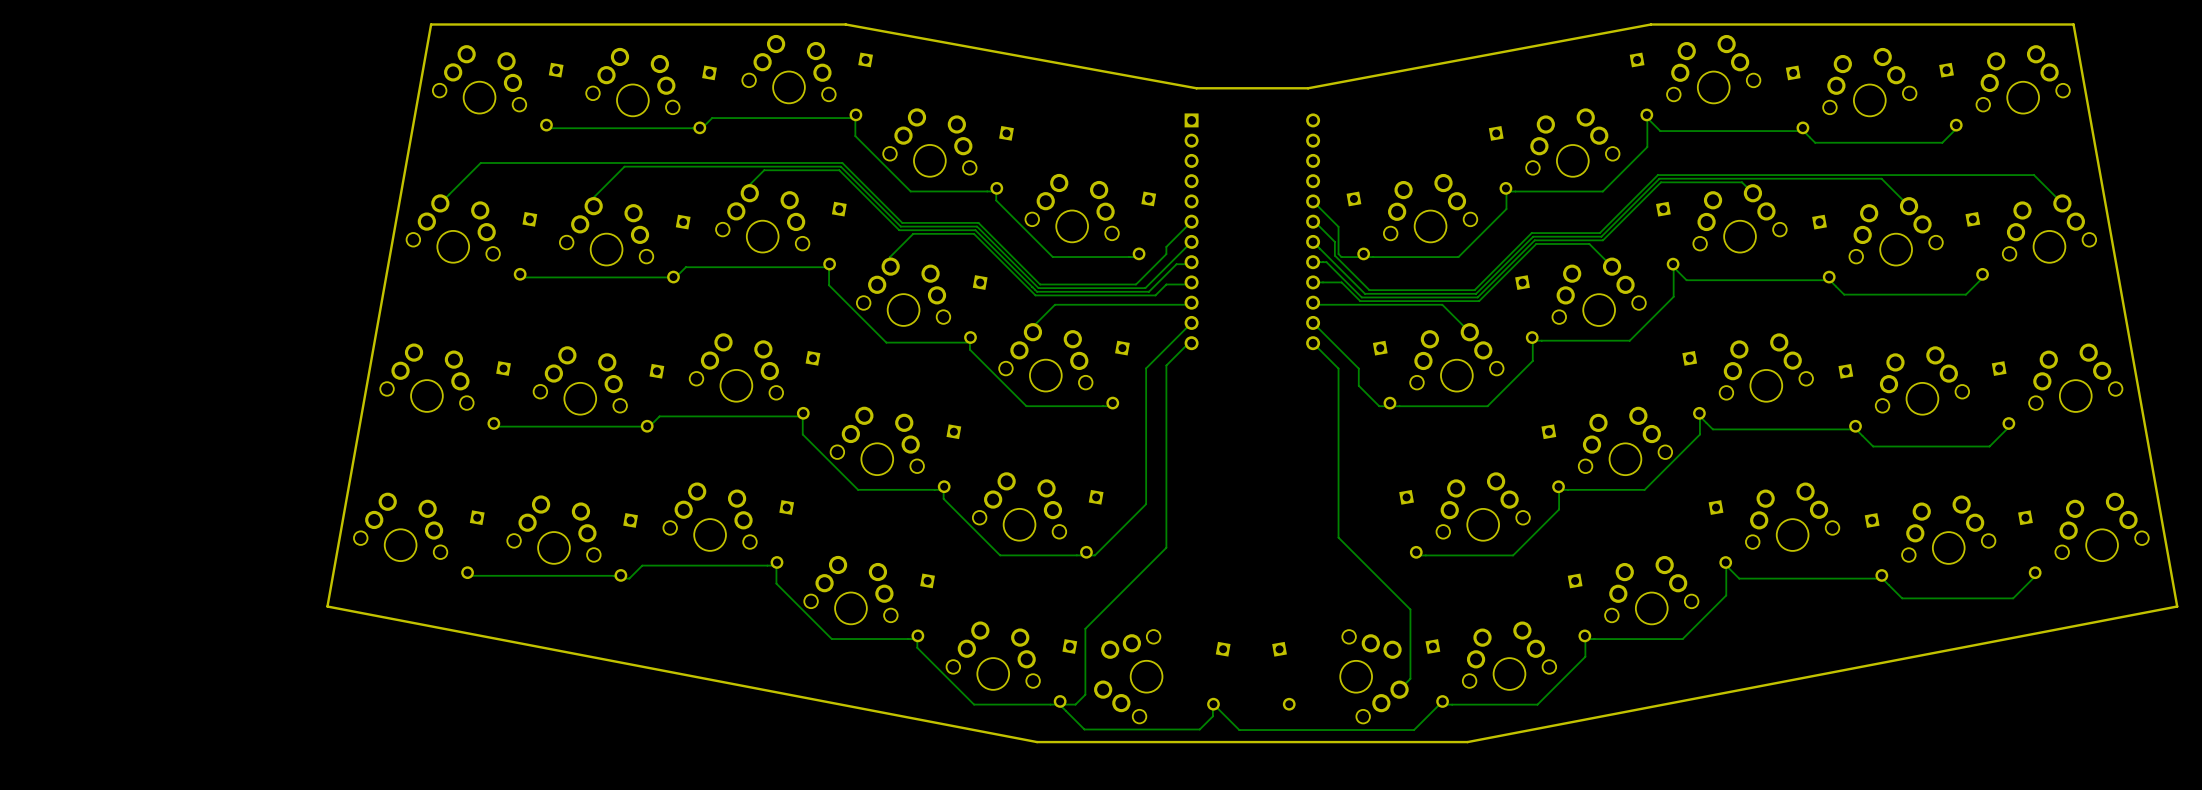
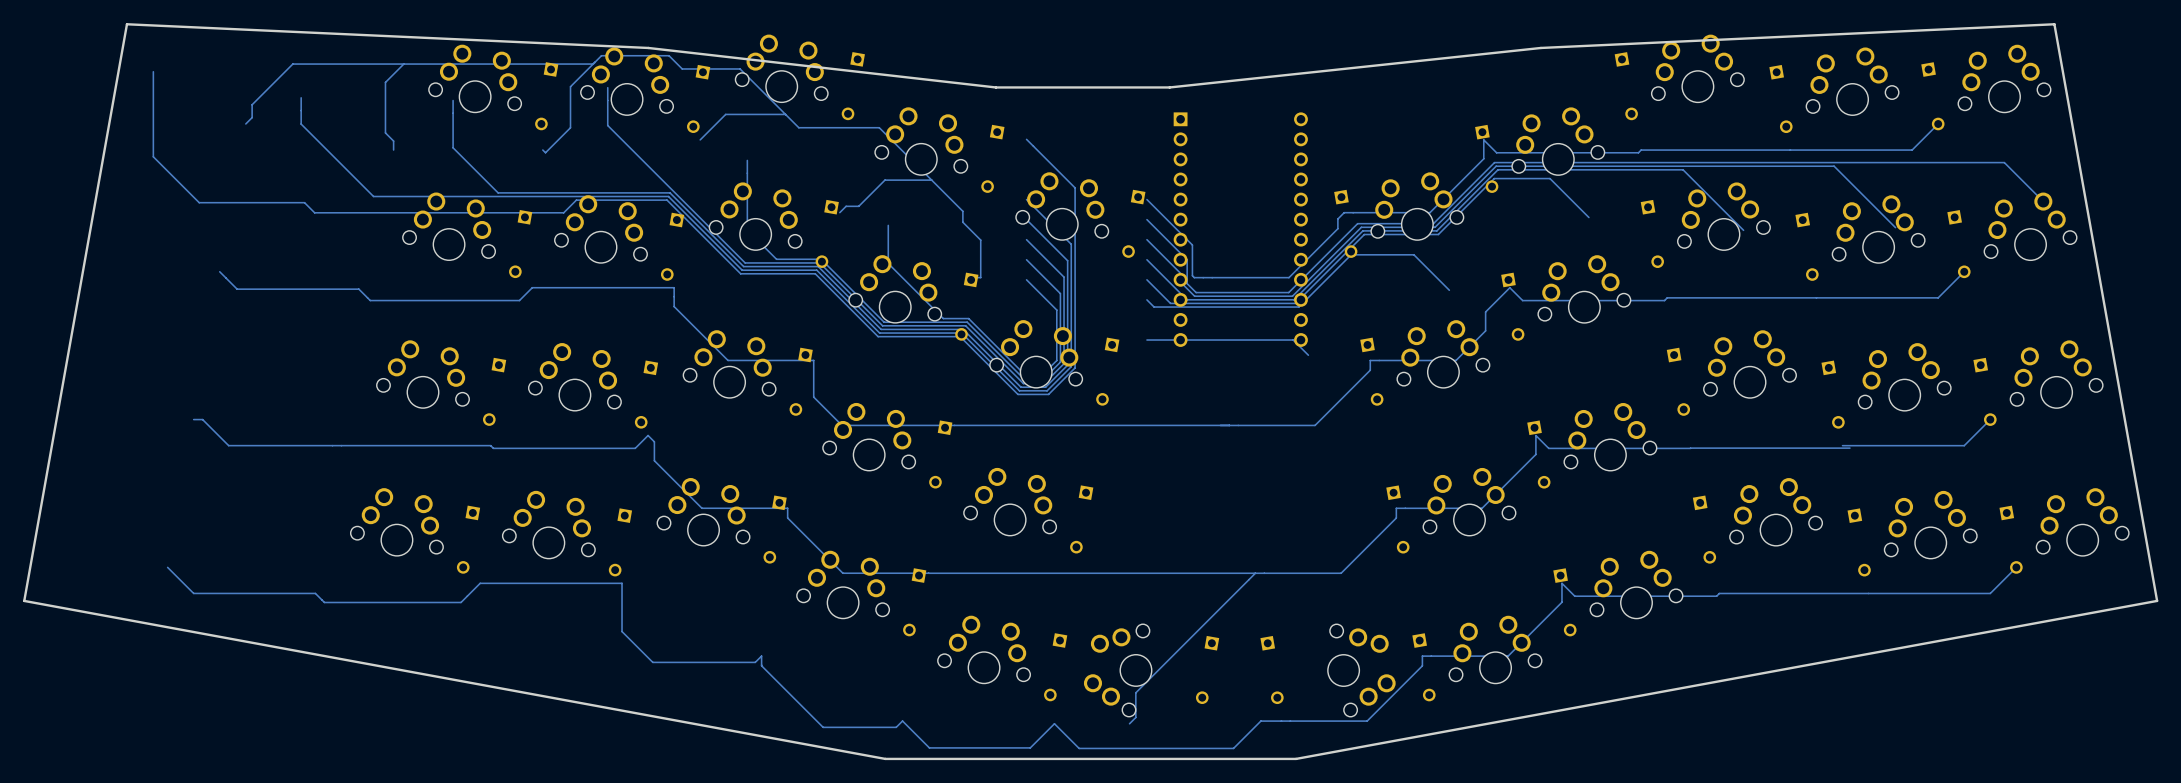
board edge: (2073, 24) (1650, 24) (1308, 88) (1196, 88) (845, 24) (431, 24) (327, 606) (1037, 742) (1467, 742) (2177, 606) -> (2054, 24) (1540, 47) (1169, 87) (995, 87) (648, 47) (126, 24) (24, 600) (885, 758) (1296, 758) (2157, 600)
track: none -> (403, 64) (385, 82) (385, 132) (393, 141) (393, 150)
track: none -> (593, 64) (292, 64) (252, 104) (252, 117) (245, 123)
track: none -> (153, 71) (153, 156) (199, 202) (304, 202) (314, 212) (563, 212) (576, 200) (667, 200) (740, 273) (815, 273) (878, 336) (960, 336) (1017, 394) (1048, 394) (1075, 367) (1075, 187) (1026, 139)
track: none -> (607, 87) (607, 125) (745, 262) (819, 262) (882, 325) (965, 325) (1023, 383) (1044, 383) (1064, 363) (1064, 277) (1026, 239)
track: none -> (301, 97) (301, 124) (373, 196) (668, 196) (742, 270) (816, 270) (879, 333) (961, 333) (1019, 390) (1047, 390) (1071, 366) (1071, 244) (1026, 199)
track: none -> (453, 100) (453, 147) (498, 192) (670, 192) (743, 266) (818, 266) (881, 329) (963, 329) (1020, 387) (1045, 387) (1067, 365) (1067, 260) (1026, 219)
track: none -> (785, 114) (725, 114) (700, 139)
track: none -> (1938, 123) (1912, 150) (1641, 150) (1638, 152) (1496, 152) (1483, 139) (1483, 158) (1429, 212) (1344, 212) (1337, 219) (1337, 228) (1288, 277) (1194, 277) (1192, 275) (1192, 245) (1146, 199)
track: (545, 128) (692, 128) (699, 130) (712, 118) (855, 118) (855, 136) (910, 191) (996, 191) (996, 200) (1052, 257) (1138, 257) -> none
track: (1956, 128) (1942, 142) (1815, 142) (1803, 131) (1660, 131) (1647, 118) (1647, 147) (1602, 191) (1506, 191) (1506, 209) (1458, 257) (1341, 257) (1338, 254) (1338, 226) (1313, 201) -> none
track: none -> (542, 150) (545, 152) (570, 127) (570, 86) (601, 55) (669, 55) (682, 68) (740, 68) (798, 127) (879, 127) (962, 211) (962, 222) (980, 240) (980, 277) (971, 277)
track: none -> (747, 160) (747, 230) (776, 259) (821, 259) (884, 322) (967, 322) (1024, 379) (1042, 379) (1060, 362) (1060, 293) (1026, 259)
track: (2033, 175) (1657, 175) (1599, 233) (1531, 233) (1474, 290) (1369, 290) (1334, 255) (1334, 241) (1314, 221) -> (2015, 173) (2004, 162) (1494, 162) (1433, 223) (1357, 223) (1288, 292) (1196, 292) (1187, 283) (1187, 259) (1146, 219)
track: none -> (931, 180) (884, 180) (858, 206) (846, 206) (839, 212)
track: (1752, 193) (1742, 182) (1660, 182) (1602, 240) (1534, 240) (1477, 297) (1361, 297) (1326, 262) (1313, 262) -> none
track: (749, 197) (749, 185) (764, 170) (839, 170) (899, 230) (975, 230) (1037, 291) (1148, 291) (1176, 264) (1189, 264) -> none
track: (593, 198) (624, 166) (840, 166) (900, 226) (977, 226) (1038, 288) (1145, 288) (1191, 241) -> none
track: (440, 203) (480, 162) (842, 162) (902, 222) (978, 222) (1040, 284) (1136, 284) (1166, 254) (1166, 246) (1191, 221) -> none
track: (1909, 206) (1881, 178) (1659, 178) (1601, 236) (1533, 236) (1476, 293) (1364, 293) (1313, 241) -> none
track: none -> (1588, 217) (1549, 178) (1494, 178) (1438, 234) (1364, 234) (1295, 303) (1170, 303) (1146, 279)
track: none -> (888, 225) (888, 263) (943, 318) (968, 318) (1025, 375) (1041, 375) (1056, 360) (1056, 310) (1026, 279)
track: none -> (1895, 227) (1834, 166) (1496, 166) (1435, 227) (1361, 227) (1292, 296) (1194, 296) (1183, 285) (1183, 276) (1146, 239)
track: none -> (1743, 230) (1683, 169) (1497, 169) (1436, 230) (1362, 230) (1294, 299) (1186, 299) (1146, 259)
track: (1612, 266) (1589, 243) (1536, 243) (1479, 301) (1360, 301) (1341, 282) (1313, 282) -> none
track: (890, 271) (890, 256) (913, 233) (974, 233) (1035, 295) (1155, 295) (1166, 284) (1189, 284) (1191, 282) -> none
track: none -> (219, 271) (237, 289) (358, 289) (370, 300) (519, 300) (532, 287) (674, 287) (674, 306) (728, 360) (813, 360) (813, 397) (842, 425) (1229, 425)
track: none -> (1964, 271) (1938, 297) (1667, 297) (1664, 300) (1522, 300) (1509, 287) (1485, 311) (1485, 330) (1455, 360) (1370, 360) (1370, 370) (1315, 425) (1220, 425)
track: (519, 277) (670, 277) (672, 280) (685, 267) (829, 267) (829, 285) (886, 342) (971, 342) -> none
track: (1983, 277) (1965, 294) (1844, 294) (1829, 280) (1686, 280) (1673, 267) (1673, 296) (1629, 340) (1532, 340) (1532, 361) (1487, 406) (1379, 406) (1358, 385) (1358, 368) (1313, 322) -> none
track: none -> (1449, 290) (1413, 254) (1351, 254) (1298, 307) (1154, 307) (1146, 299)
track: (1191, 302) (1189, 304) (1055, 304) (1034, 325) -> none
track: (1313, 302) (1315, 304) (1442, 304) (1469, 332) -> none
track: (1191, 322) (1146, 368) (1146, 504) (1094, 555) (1000, 555) (943, 498) (943, 489) (858, 489) (802, 434) (802, 416) (659, 416) (646, 429) (643, 426) (493, 426) -> none
track: (969, 340) (969, 349) (1026, 406) (1112, 406) -> none
track: none -> (1146, 340) (1293, 340) (1308, 355)
track: (1188, 343) (1166, 365) (1166, 547) (1085, 628) (1085, 694) (1075, 704) (974, 704) (917, 647) (917, 639) (831, 639) (776, 583) (776, 565) (642, 565) (629, 578) (616, 578) (614, 575) (466, 575) -> none
track: (1313, 343) (1338, 368) (1338, 537) (1410, 609) (1410, 678) (1399, 689) -> none
track: none -> (193, 419) (202, 419) (228, 445) (490, 445) (493, 448) (635, 448) (648, 435) (654, 441) (654, 460) (701, 508) (787, 508) (787, 518) (842, 573) (928, 573)
track: none -> (1990, 419) (1964, 445) (1842, 445)
track: (2009, 426) (1989, 446) (1873, 446) (1856, 429) (1712, 429) (1699, 416) (1699, 434) (1644, 489) (1559, 489) (1559, 509) (1513, 555) (1416, 555) -> none
track: none -> (1690, 448) (1548, 448) (1535, 435) (1535, 454) (1482, 508) (1396, 508) (1396, 518) (1341, 573) (928, 573)
track: none -> (1849, 448) (1690, 448)
track: none -> (167, 567) (193, 593) (315, 593) (324, 602) (461, 602) (480, 583) (622, 583) (622, 631) (652, 662) (755, 662) (761, 656) (761, 665) (823, 727) (896, 727) (902, 721) (929, 747) (1030, 747) (1054, 723) (1079, 748) (1233, 748) (1260, 721) (1367, 721) (1422, 665) (1422, 656) (1508, 656) (1561, 602) (1561, 583) (1574, 596) (1716, 596) (1719, 593) (1990, 593) (2016, 567)
track: (2035, 575) (2013, 598) (1902, 598) (1882, 578) (1739, 578) (1726, 565) (1726, 595) (1682, 639) (1585, 639) (1585, 656) (1537, 704) (1443, 704) -> none
track: none -> (1255, 573) (1135, 692) (1135, 717) (1129, 723)
track: (1442, 701) (1414, 730) (1239, 730) (1213, 704) -> none
track: (1059, 704) (1084, 729) (1199, 729) (1212, 716) (1212, 707) -> none

